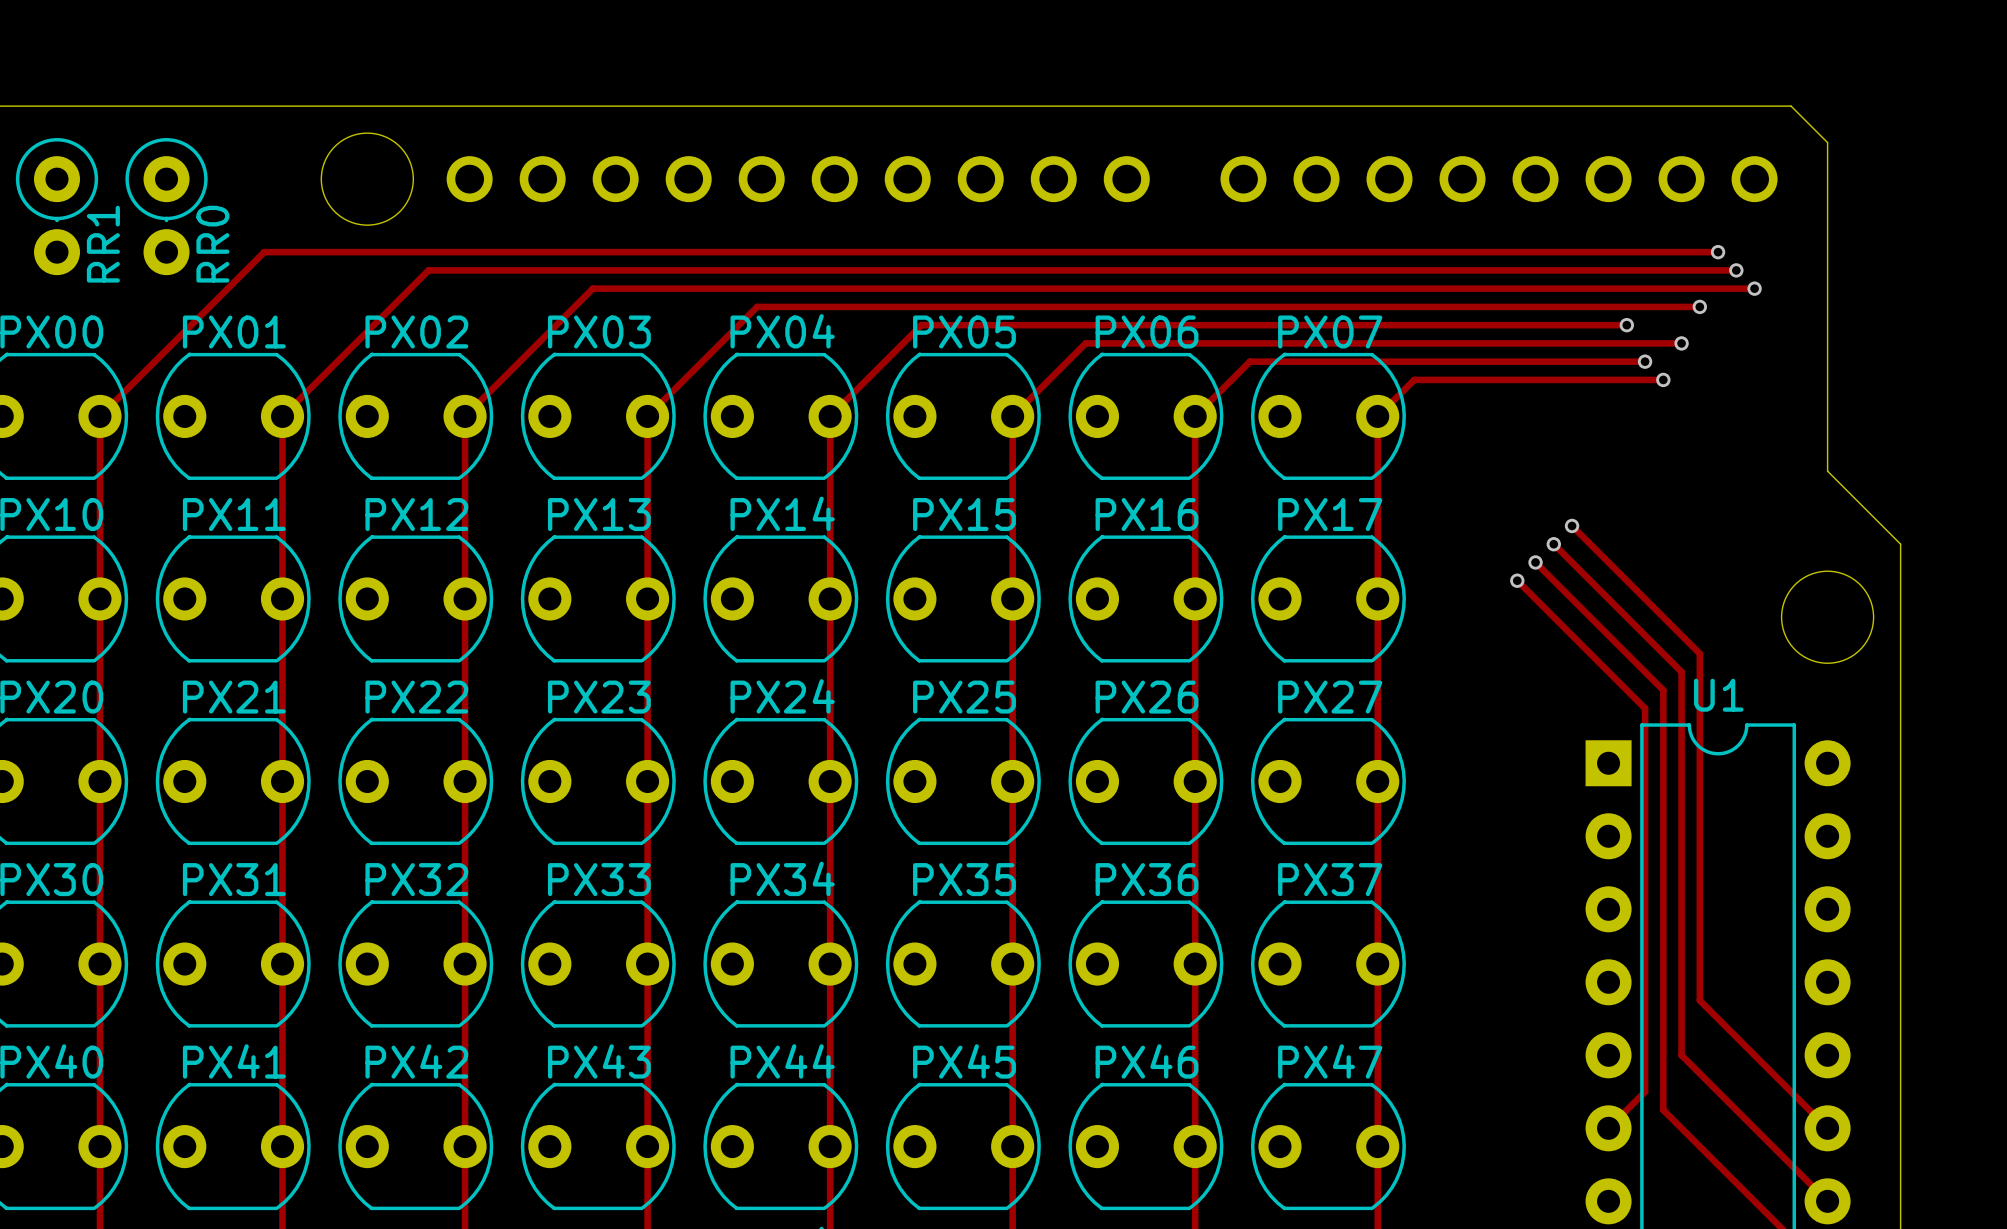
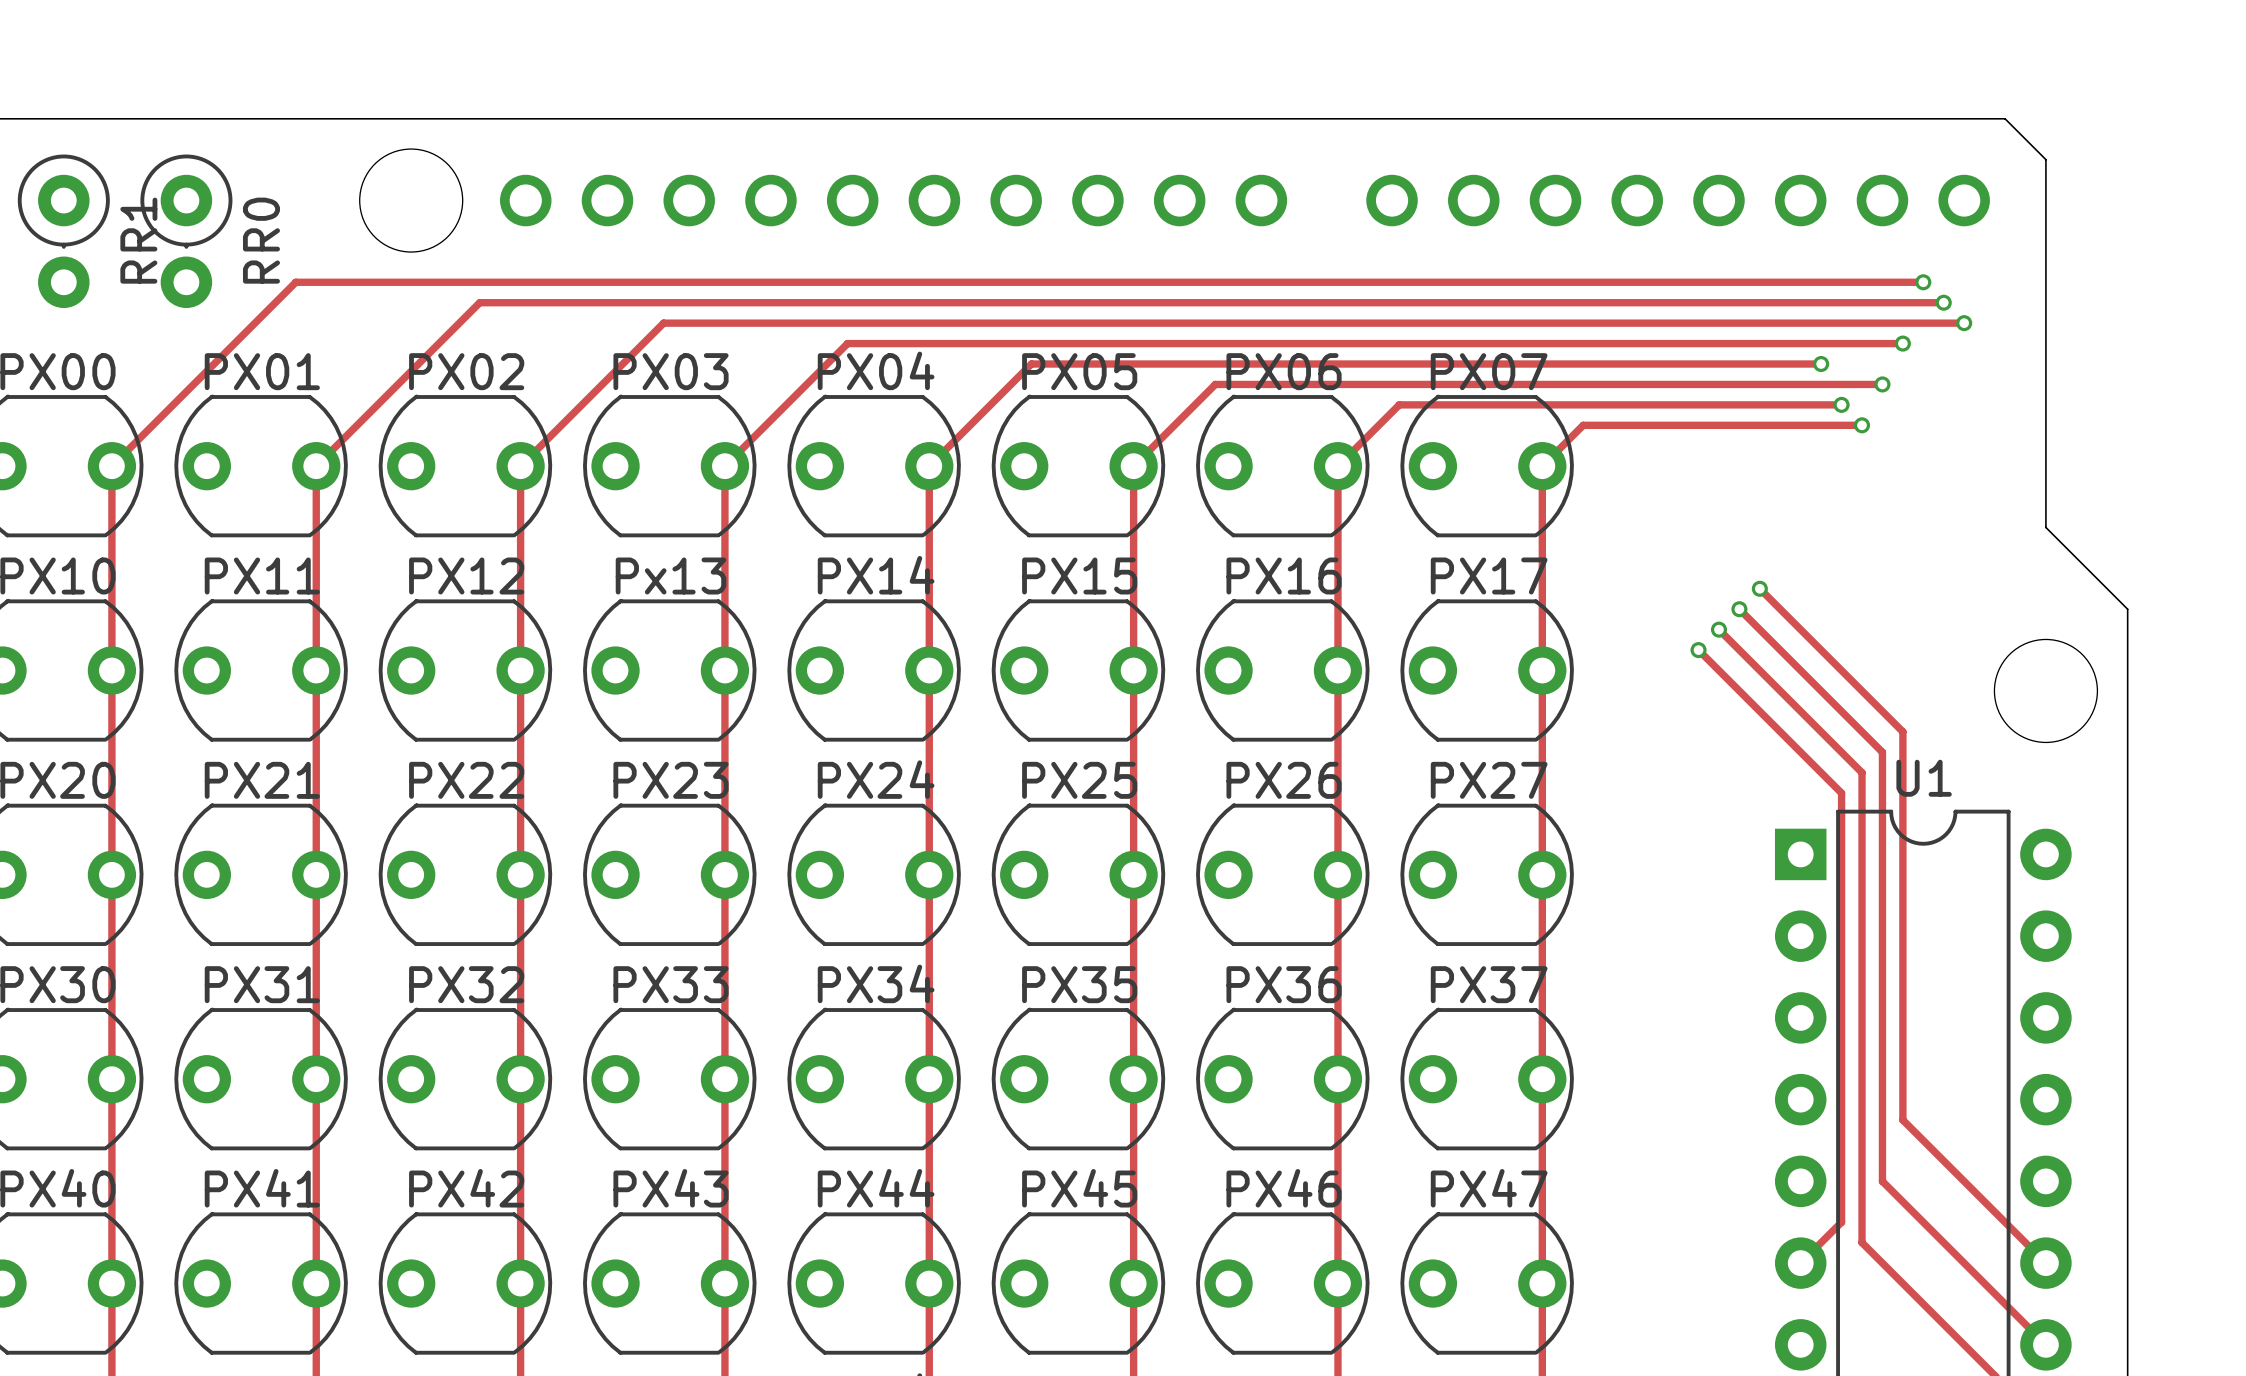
RR1 name position: RR1 (103, 244) -> RR1 (138, 240)
RR0 name position: RR0 (212, 244) -> RR0 (261, 240)
PX13 name: PX13 (599, 514) -> Px13 (671, 576)

